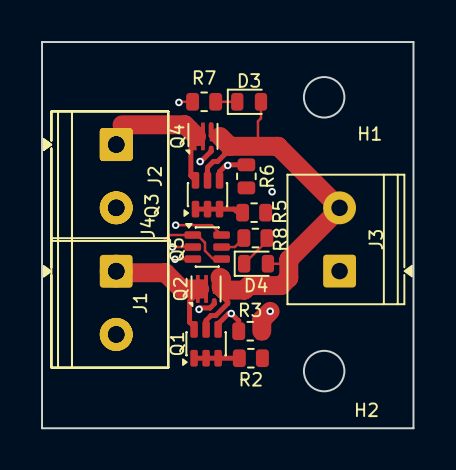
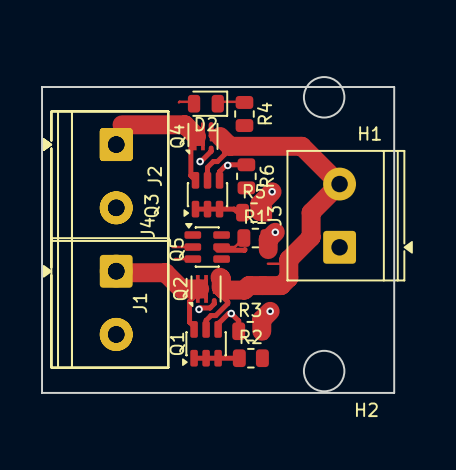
board edge: (42, 87) (42, 42) (413, 42) (413, 428) (42, 428) (42, 392) -> (42, 87) (394, 87) (394, 392) (42, 392)
R7: (204, 101) -> none
D3: (247, 101) -> none
track: (260, 101) (257, 136) -> none
via: (178, 102) -> none
D2: none -> (207, 103)
R4: none -> (244, 114)
track: (278, 146) (340, 208) (311, 237) -> (278, 146) (301, 146) (339, 184) (311, 212) (311, 237)
track: none -> (272, 191) (259, 204) (259, 211)
R5 name rotation: 0° (279, 211) -> 90° clockwise (254, 191)
R5 name position: R5 (279, 211) -> R5 (254, 191)
track: (175, 225) (211, 225) (221, 235) -> none
via: (175, 225) -> none
track: none -> (275, 232) (268, 239) (268, 249)
via: none -> (275, 232)
track: (266, 238) (266, 240) (244, 263) -> none
R8 name: R8 (279, 239) -> R1 (255, 216)
J3 position: (349, 239) -> (349, 215)
J3 name position: J3 (375, 239) -> J3 (274, 215)
track: (164, 240) (169, 235) (197, 235) (204, 242) (204, 250) (213, 259) (221, 259) -> none
via: (172, 247) -> none
track: none -> (245, 249) (217, 250)
via: (175, 259) -> none
D4: (254, 263) -> none
R2 name position: R2 (251, 379) -> R2 (251, 336)

